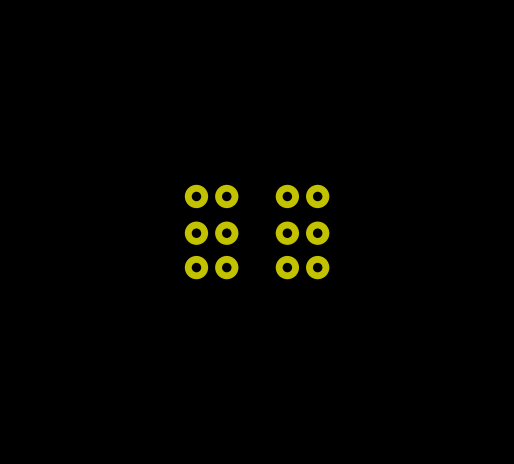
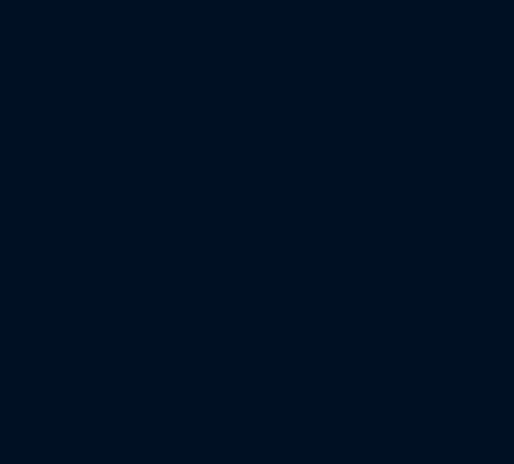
part: (257, 232) -> none

